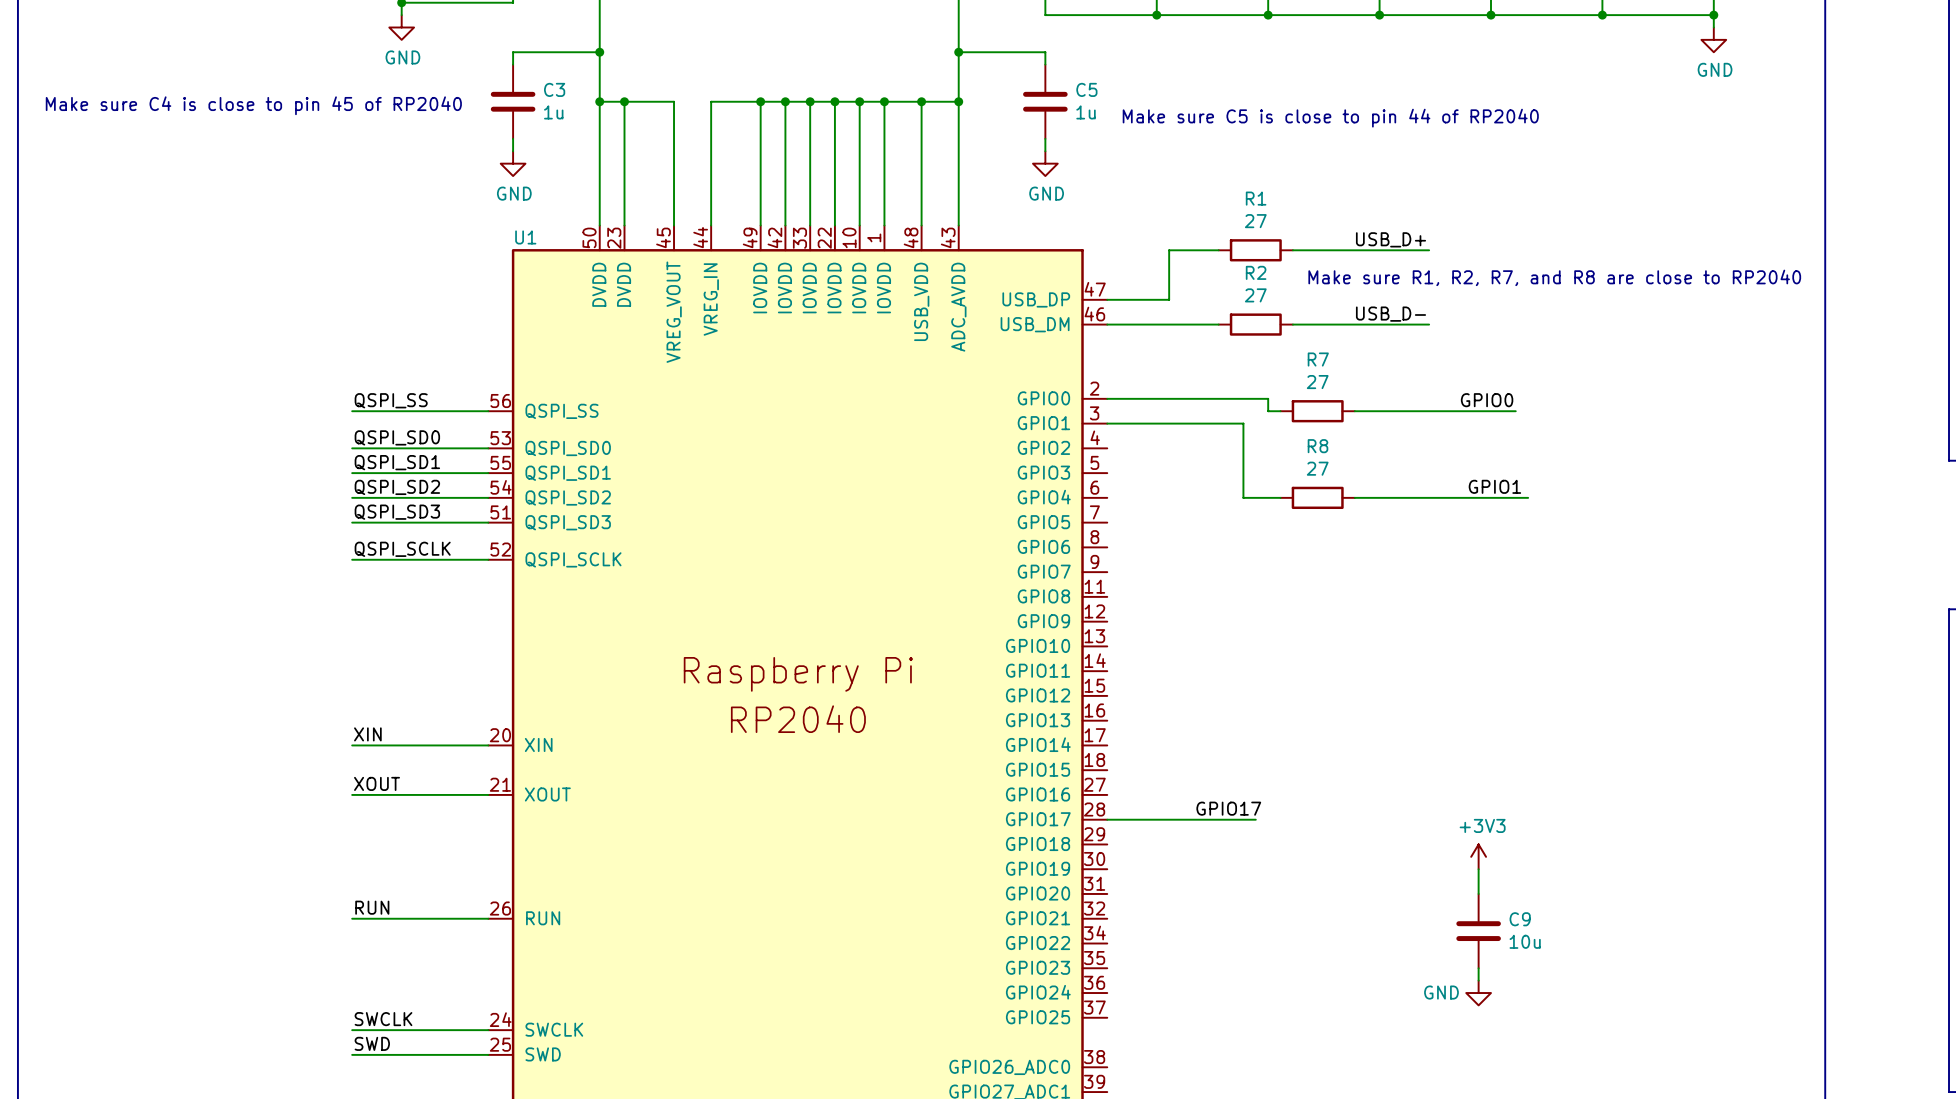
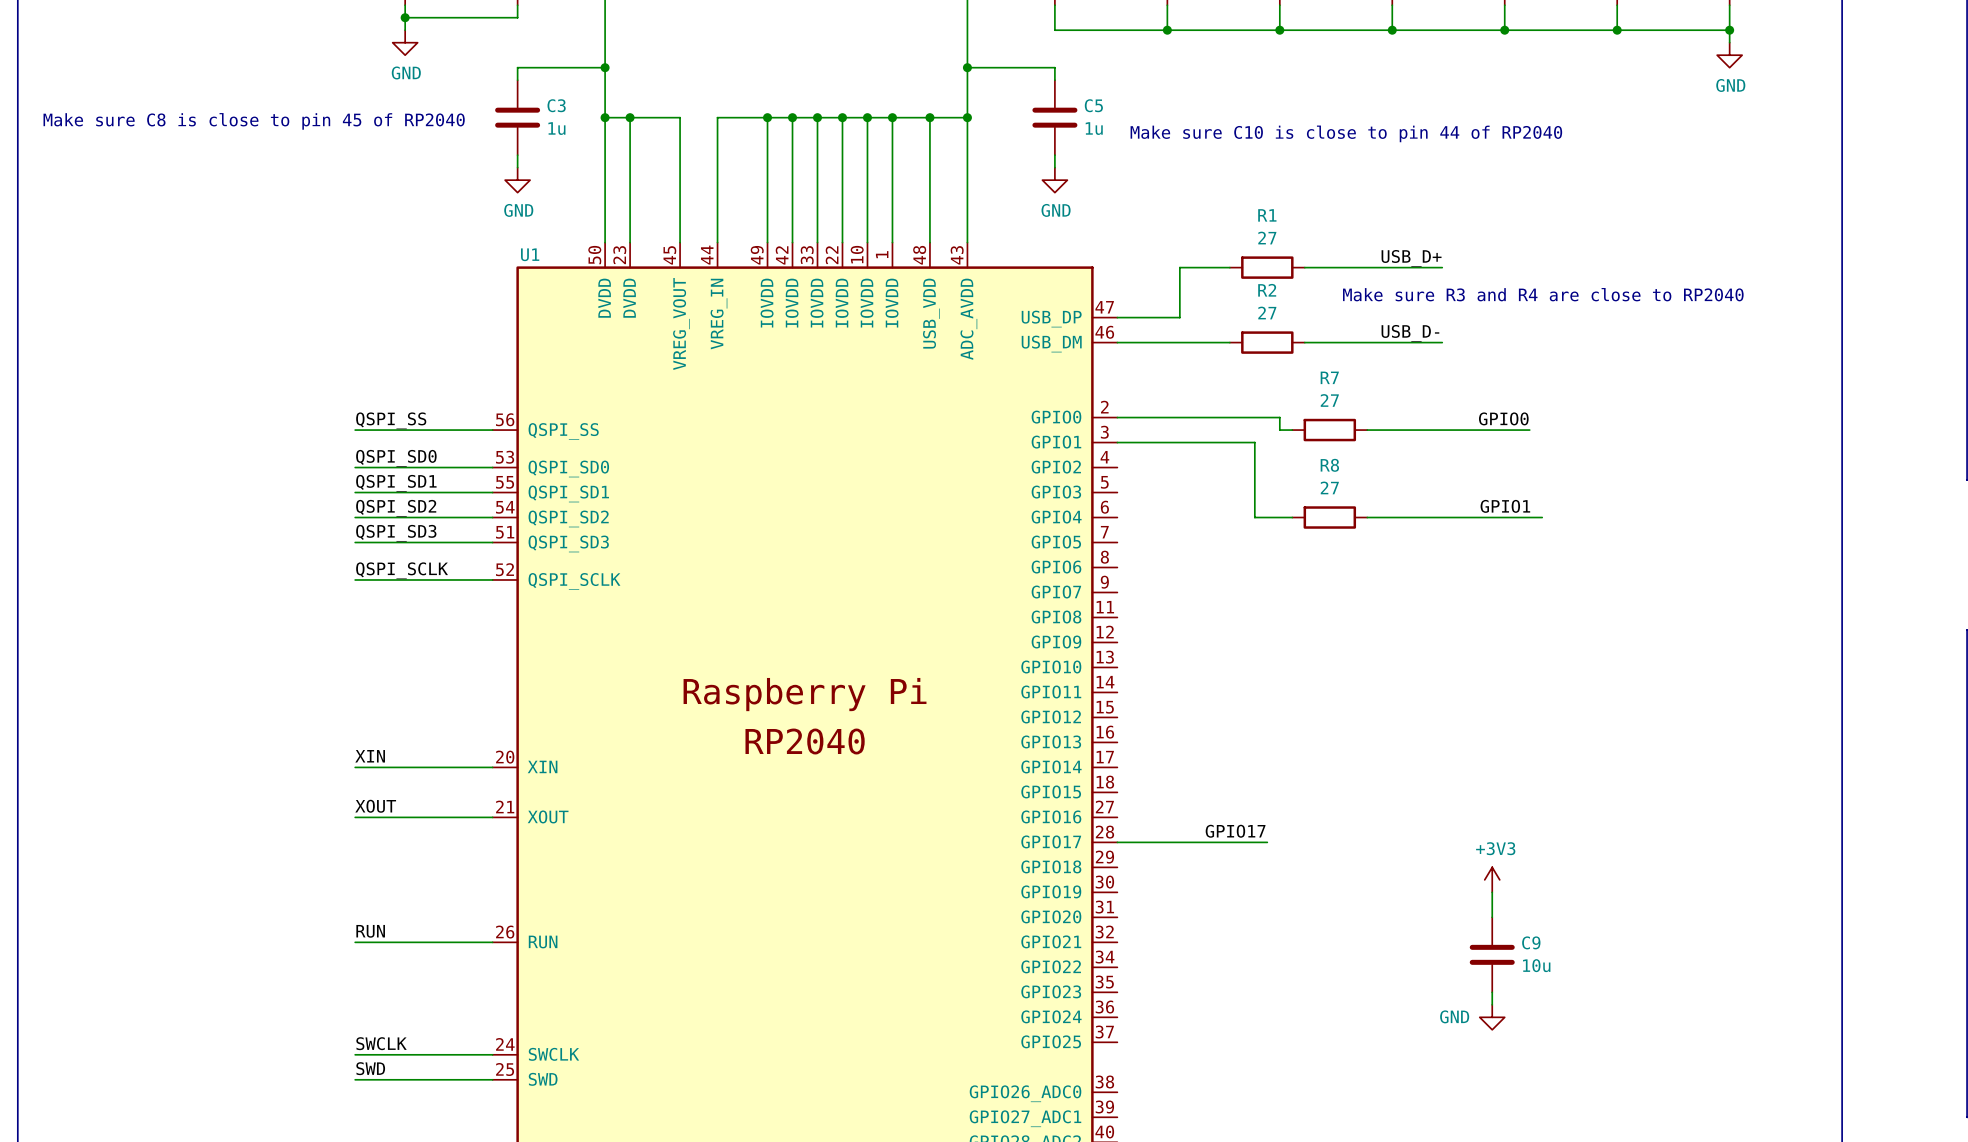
text: Make sure C4 is close to pin 45 of RP2040 (253, 105) -> Make sure C8 is close to pin 45 of RP2040 (254, 121)
text: Make sure C5 is close to pin 44 of RP2040 (1330, 118) -> Make sure C10 is close to pin 44 of RP2040 (1346, 133)
text: Make sure R1, R2, R7, and R8 are close to RP2040 (1554, 277) -> Make sure R3 and R4 are close to RP2040 (1543, 294)

